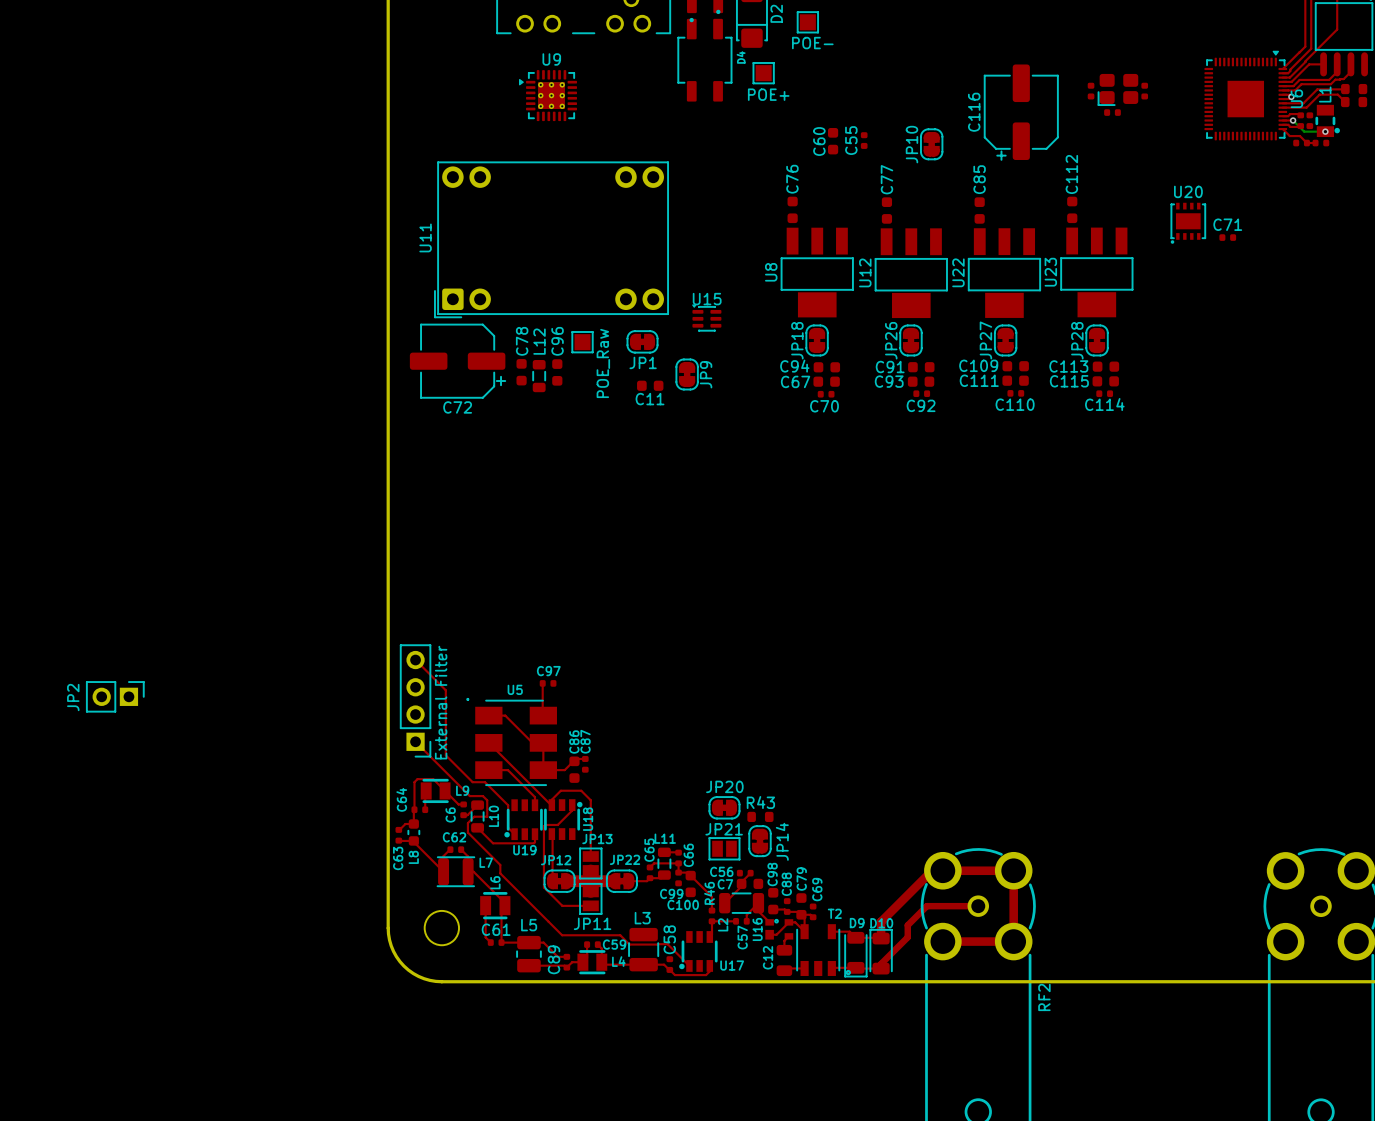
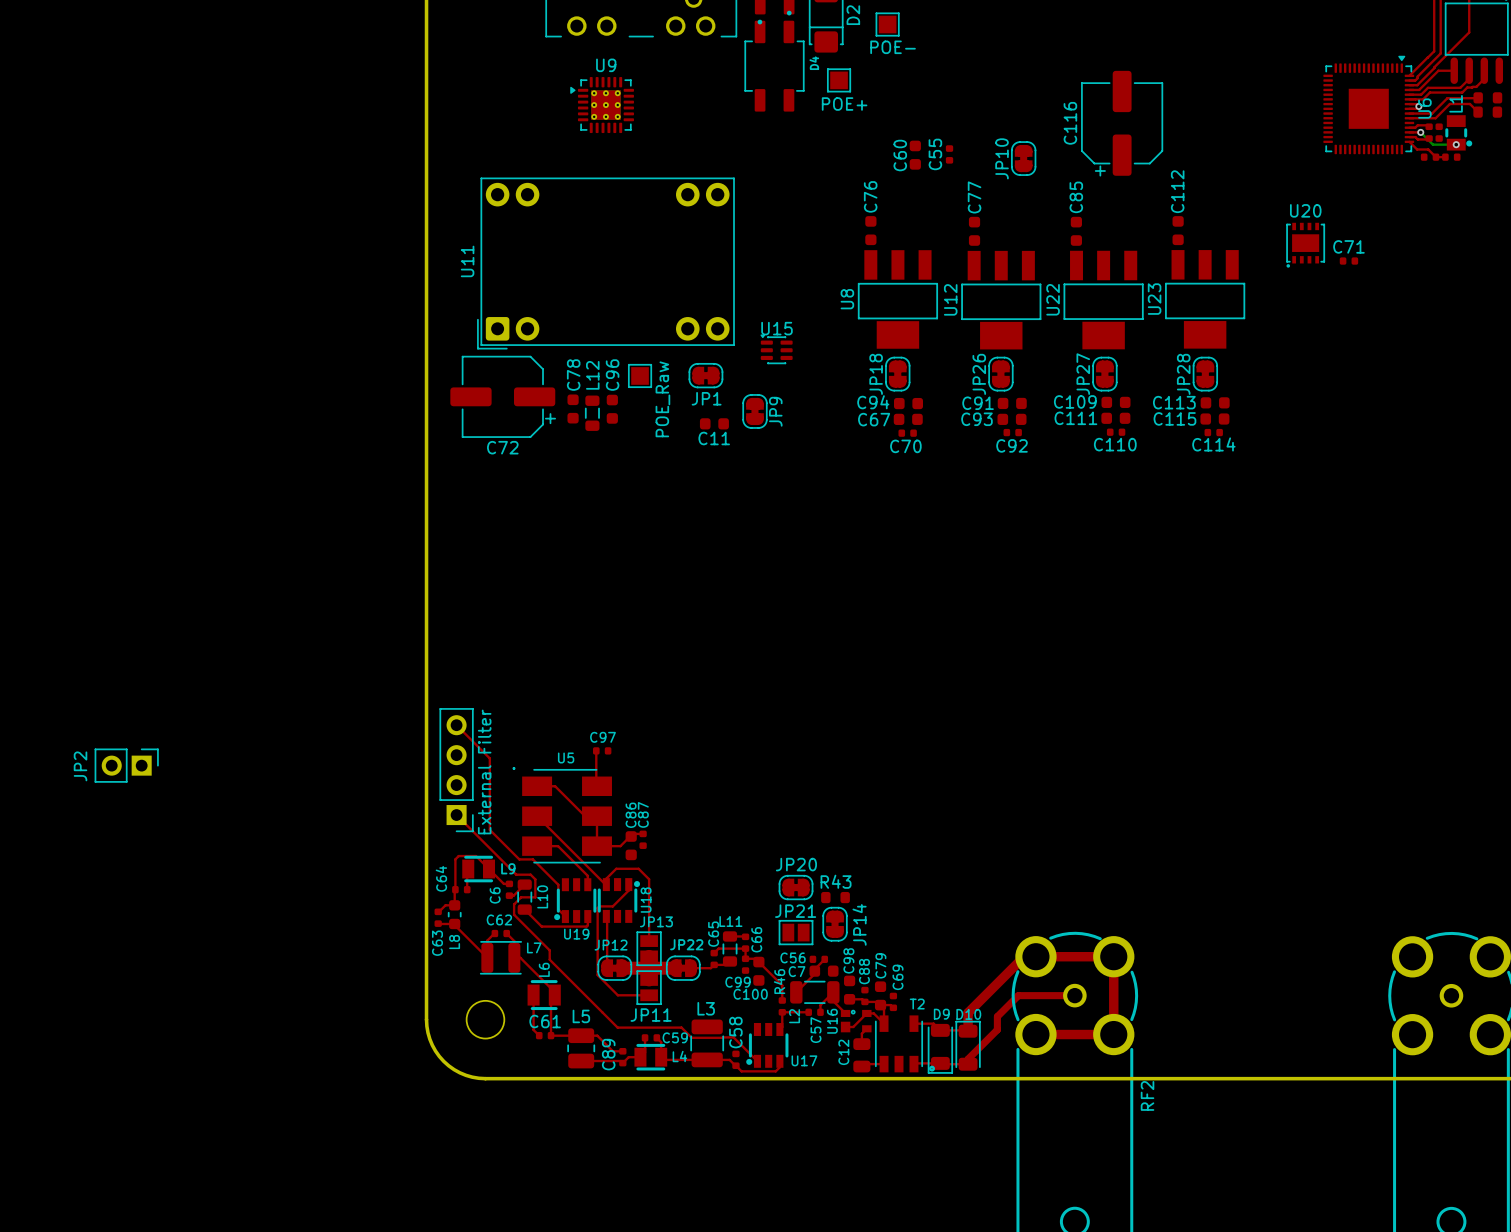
part: (1118, 89) -> none
part: (1091, 91) -> none
part: (1144, 91) -> none
part: (1112, 112) -> none

